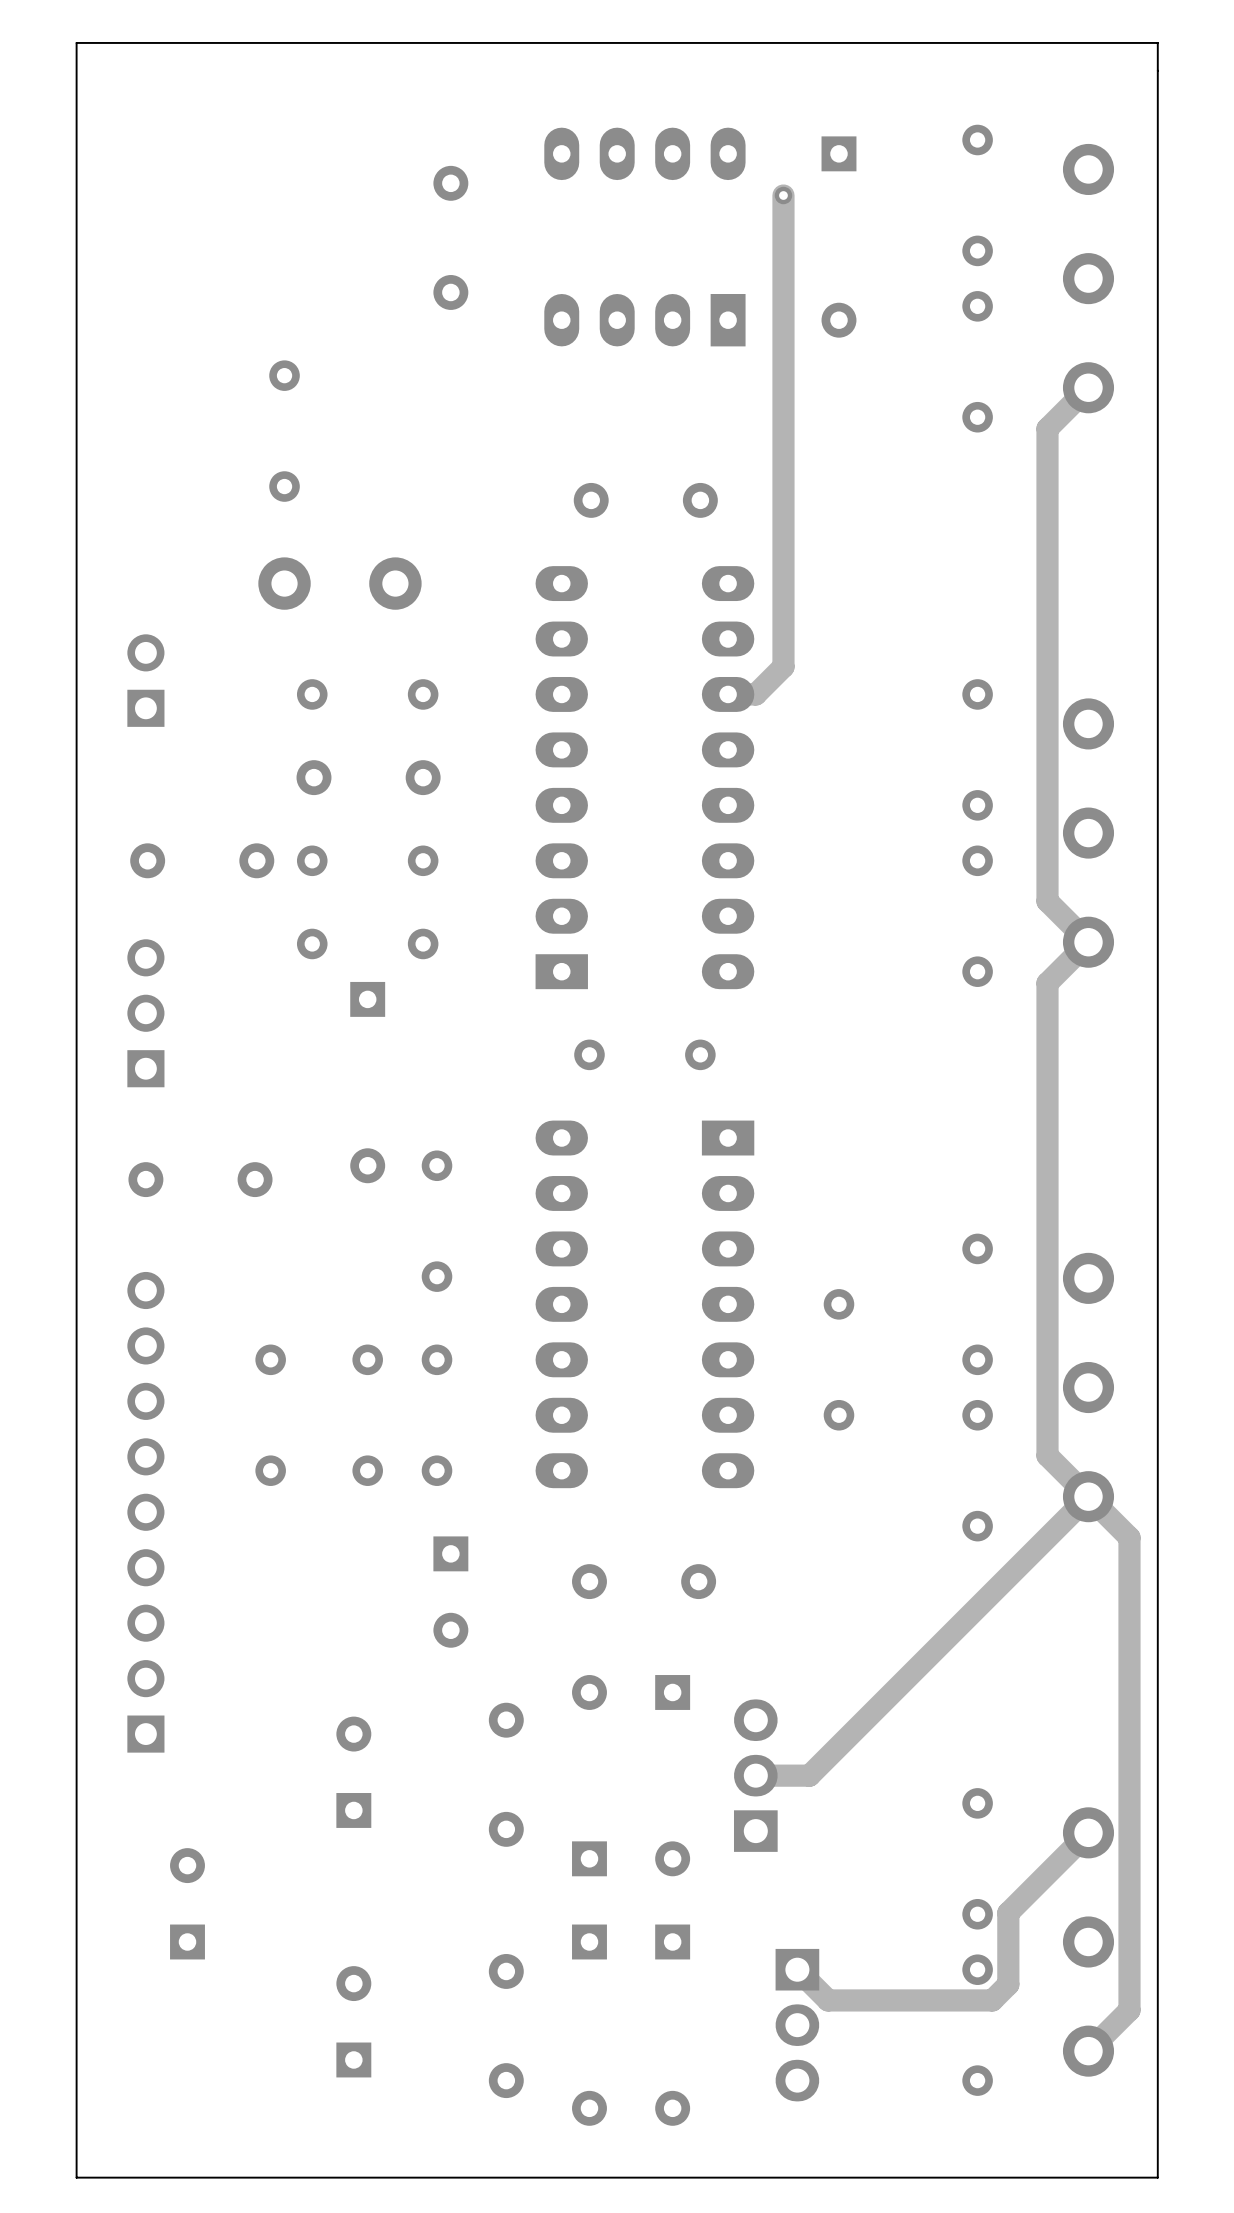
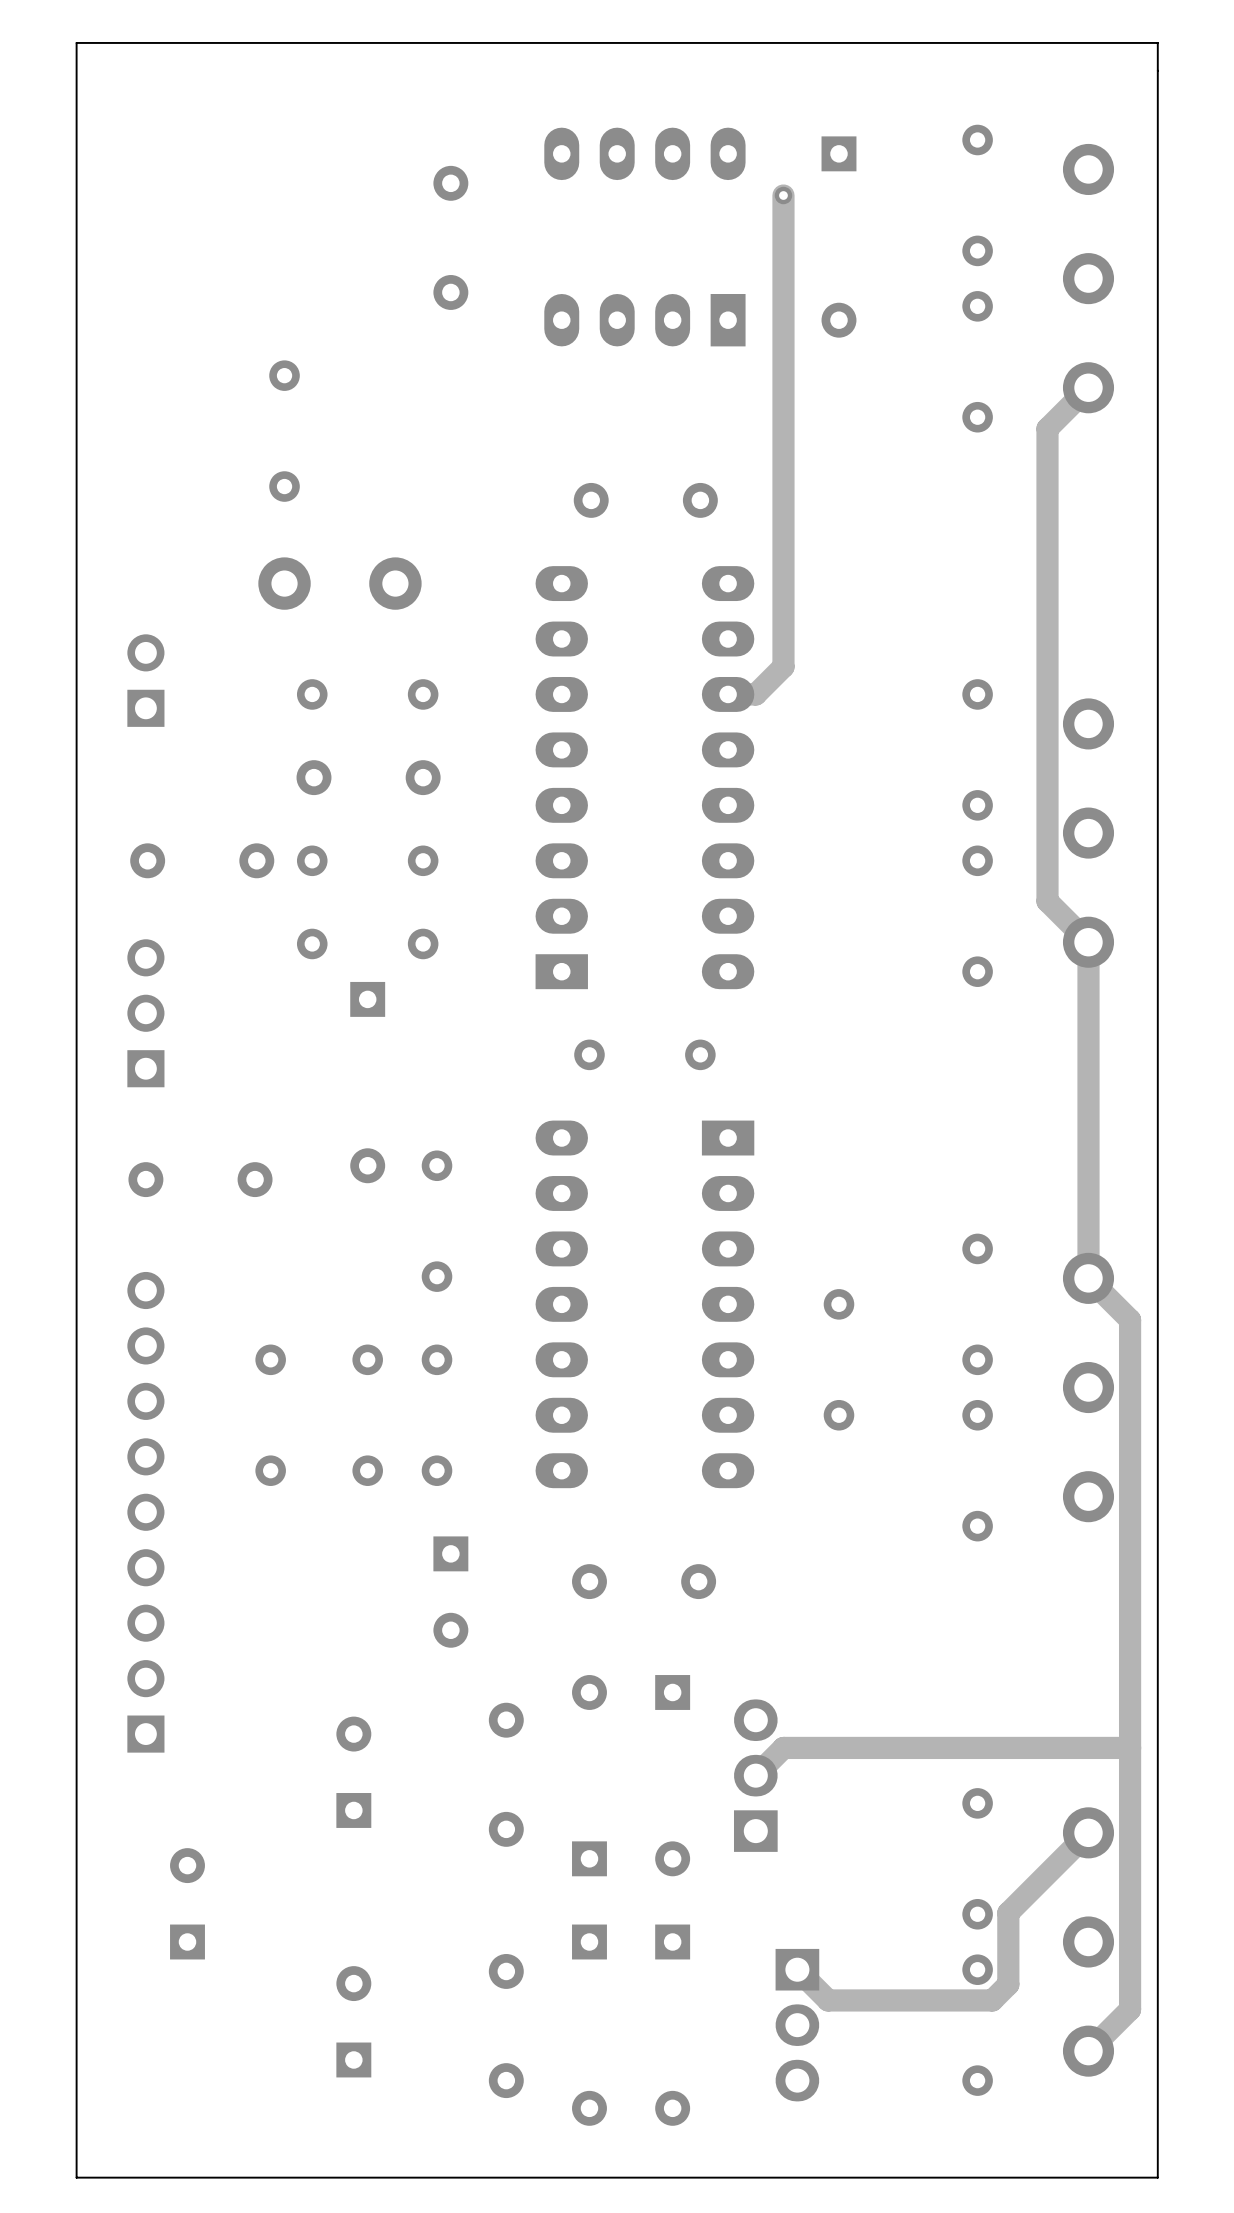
track: (1088, 942) (1047, 983) (1047, 1455) (1129, 1537) (1129, 2010) -> (1088, 942) (1088, 1278) (1130, 1319) (1129, 2010)
track: (1088, 1496) (809, 1775) (755, 1775) -> (1130, 1747) (783, 1747) (755, 1775)

